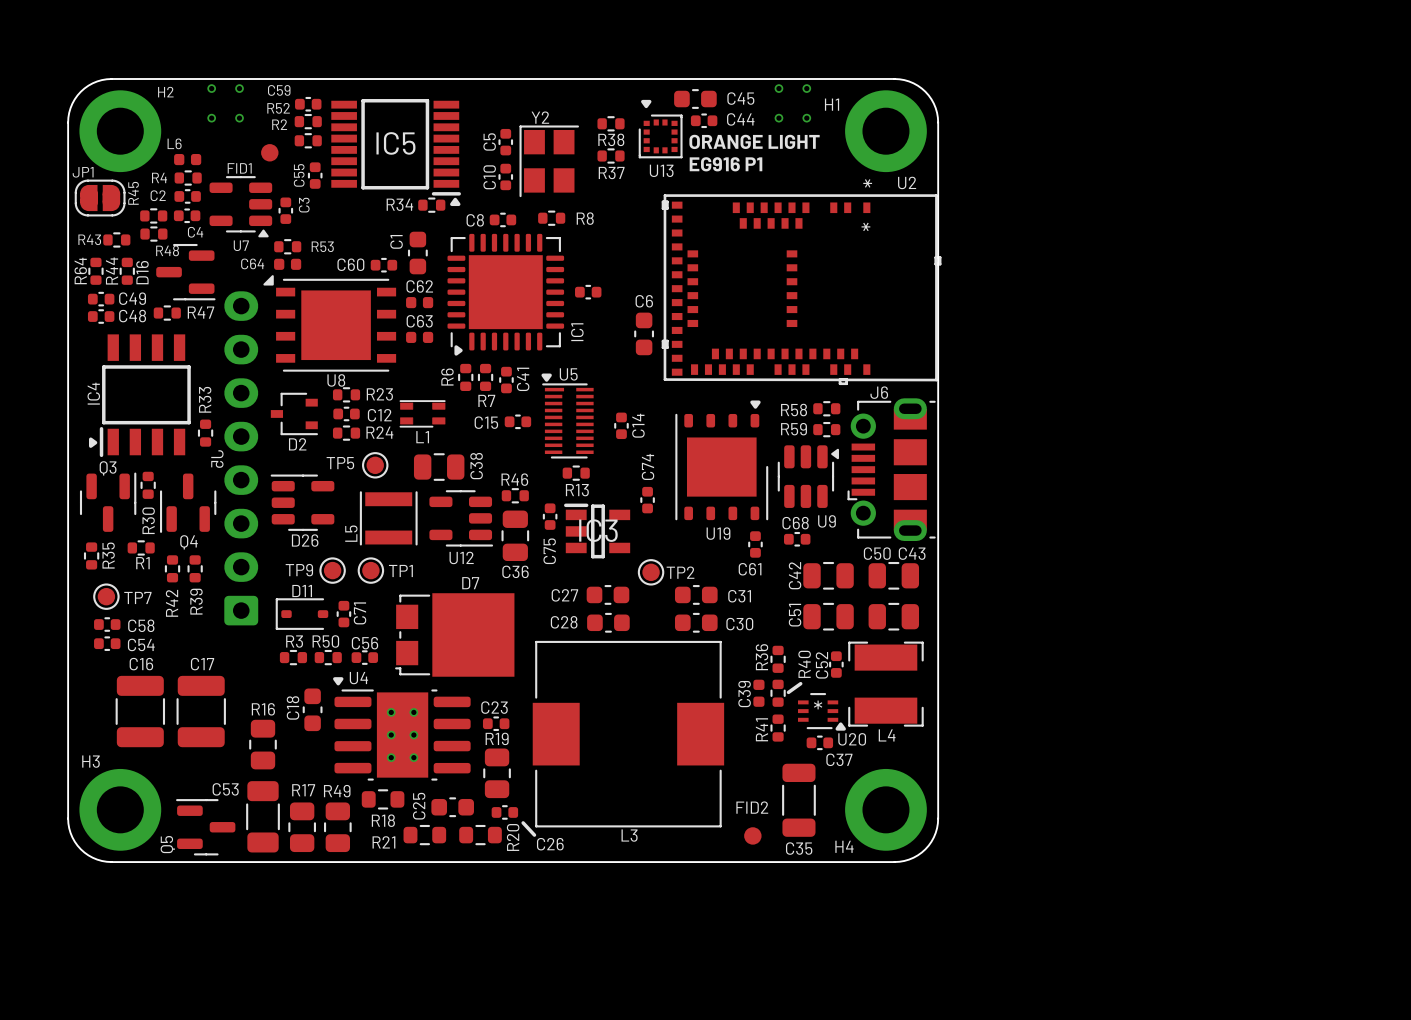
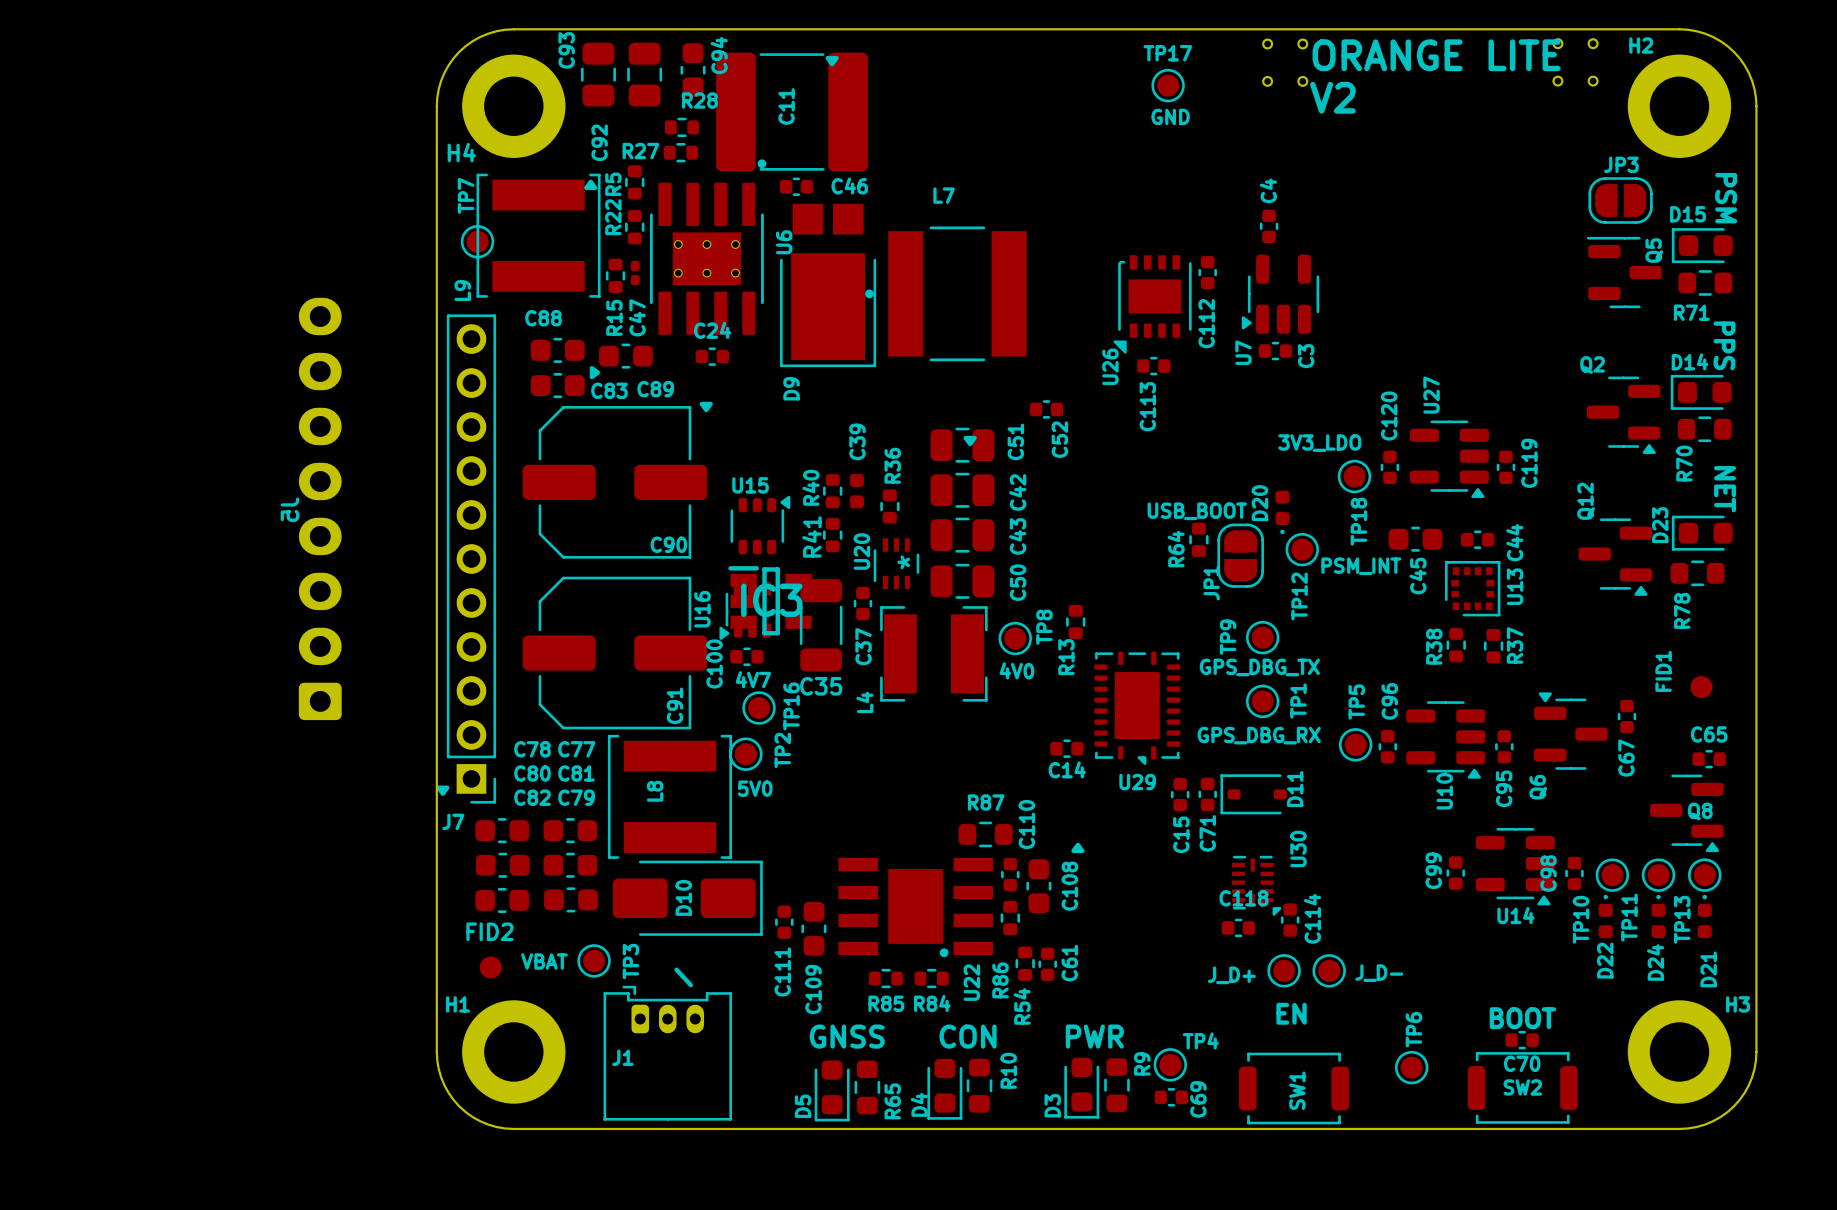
board edge: (111, 78) (894, 78) (909, 81) (925, 91) (933, 103) (938, 122) (938, 818) (935, 832) (925, 849) (909, 859) (894, 862) (111, 862) (92, 857) (80, 849) (70, 832) (68, 818) (68, 122) (72, 103) (80, 91) (97, 81) (111, 78) -> none
board edge: none -> (513, 29) (1679, 29) (1704, 33) (1727, 46) (1739, 58) (1748, 72) (1754, 89) (1756, 106) (1756, 1051) (1752, 1077) (1739, 1099) (1727, 1112) (1712, 1121) (1696, 1127) (1679, 1128) (513, 1128) (488, 1124) (465, 1112) (453, 1099) (444, 1085) (438, 1069) (436, 1051) (436, 106) (438, 89) (444, 72) (459, 51) (472, 41) (488, 33) (513, 29)
H2 name position: H2 (165, 92) -> H2 (1641, 45)
C45 name rotation: 0° (740, 98) -> 90° counterclockwise (1418, 576)
C45 name position: C45 (740, 98) -> C45 (1418, 576)
C45 position: (695, 99) -> (1415, 539)
text: none -> ORANGE LITE (1436, 55)
part: (225, 103) -> none
part position: (792, 103) -> (1285, 62)
C59: (308, 104) -> none
H1 name position: H1 (832, 104) -> H1 (458, 1004)
part: none -> (1575, 62)
C94: none -> (693, 70)
C93: none -> (598, 74)
C92: none -> (644, 74)
C44 name rotation: 0° (740, 119) -> 90° counterclockwise (1514, 542)
C44 position: (704, 120) -> (1477, 539)
R52: (308, 121) -> none
R38 rotation: 0° (611, 123) -> 90° clockwise (1456, 645)
R38 position: (611, 123) -> (1456, 645)
TP17: none -> (1168, 85)
H2 position: (120, 131) -> (1679, 106)
H1 position: (885, 131) -> (513, 1051)
text: none -> V2 (1332, 97)
U13 rotation: 0° (660, 136) -> 90° counterclockwise (1472, 588)
U13 position: (660, 136) -> (1472, 588)
R2: (308, 140) -> none
text: ORANGE LIGHT (754, 141) -> none
C5: (505, 142) -> none
C11: none -> (792, 111)
IC5: (396, 147) -> none
text: none -> GND (1170, 116)
FID1 position: (269, 152) -> (1701, 687)
R28: none -> (682, 127)
R37 rotation: 0° (611, 156) -> 90° clockwise (1493, 646)
R37 position: (611, 156) -> (1493, 646)
L6: (187, 159) -> none
Y2: (549, 161) -> none
text: EG916 P1 (725, 164) -> none
FID1 name rotation: 0° (239, 168) -> 90° counterclockwise (1663, 671)
JP1 name position: JP1 (83, 172) -> JP1 (1211, 582)
C55: (315, 175) -> none
C10: (505, 176) -> none
R27: none -> (680, 152)
R4: (188, 178) -> none
C2: (187, 196) -> none
JP1 rotation: 0° (100, 198) -> 90° clockwise (1240, 555)
JP1 position: (100, 198) -> (1240, 555)
R5: none -> (634, 182)
C46: none -> (796, 186)
R34: (431, 205) -> none
U7 rotation: 0° (240, 206) -> 90° clockwise (1280, 294)
U7 position: (240, 206) -> (1280, 294)
text: none -> PSM (1726, 198)
C3 rotation: 0° (285, 210) -> 90° clockwise (1275, 351)
C3 position: (285, 210) -> (1275, 351)
JP3: none -> (1620, 200)
R45: (153, 215) -> none
C4 rotation: 0° (187, 215) -> 90° clockwise (1269, 226)
C4 position: (187, 215) -> (1269, 226)
R8: (551, 218) -> none
C8: (502, 219) -> none
C4 name position: C4 (195, 232) -> C4 (1268, 190)
R48: (153, 234) -> none
R22: none -> (634, 227)
R43: (116, 239) -> none
L9: none -> (538, 235)
R53: (287, 246) -> none
D15: none -> (1702, 245)
U6: none -> (708, 247)
C1: (417, 253) -> none
C64: (287, 264) -> none
C60: (383, 265) -> none
R64 name position: R64 (80, 270) -> R64 (1176, 549)
R64 position: (95, 271) -> (1198, 539)
R44: (127, 271) -> none
C47: none -> (635, 273)
C112: none -> (1207, 272)
D16: (185, 272) -> none
R15: none -> (615, 275)
R71: none -> (1705, 282)
D9: none -> (828, 285)
L7: none -> (945, 293)
U2: (801, 289) -> none
IC1: (505, 292) -> none
part: (588, 292) -> none
U26: none -> (1152, 304)
C49: (101, 299) -> none
C62: (419, 302) -> none
R47: (167, 313) -> none
C48: (101, 316) -> none
U8: (329, 323) -> none
text: none -> PPS (1724, 345)
C88: none -> (557, 350)
C6: (644, 333) -> none
C63: (419, 337) -> none
C89: none -> (625, 356)
C24: none -> (712, 356)
C113: none -> (1153, 366)
C83: none -> (557, 385)
D14: none -> (1701, 392)
R6: (465, 377) -> none
R7: (485, 377) -> none
C41: (506, 380) -> none
Q2: none -> (1623, 415)
R23: (346, 394) -> none
IC4: (145, 395) -> none
R70: none -> (1704, 429)
text: none -> 3V3_LDO (1319, 443)
R58: (826, 408) -> none
D2: (294, 413) -> none
C12: (346, 413) -> none
L1: (422, 413) -> none
U27: none -> (1449, 459)
U5: (567, 420) -> none
C15 rotation: 0° (517, 421) -> 90° clockwise (1180, 794)
C15 position: (517, 421) -> (1180, 794)
C15 name position: C15 (486, 422) -> C15 (1181, 834)
C14 rotation: 0° (621, 425) -> 90° clockwise (1066, 748)
C14 position: (621, 425) -> (1066, 748)
C120: none -> (1389, 467)
C119: none -> (1505, 467)
R59: (826, 429) -> none
TP18: none -> (1354, 476)
R33: (205, 433) -> none
R24: (346, 433) -> none
drawing: [88, 437, 98, 448] -> none
C90: none -> (614, 482)
text: none -> NET (1725, 489)
text: none -> USB_BOOT (1197, 511)
D20: none -> (1282, 512)
TP5 name rotation: 0° (340, 463) -> 90° counterclockwise (1356, 702)
TP5 name position: TP5 (340, 463) -> TP5 (1356, 702)
TP5 position: (375, 465) -> (1355, 744)
C38: (439, 467) -> none
U19: (721, 467) -> none
J6: (891, 469) -> none
U15: none -> (760, 524)
R13 rotation: 0° (576, 473) -> 90° clockwise (1075, 622)
R13 position: (576, 473) -> (1075, 622)
U9: (808, 476) -> none
D23: none -> (1702, 533)
R30: (148, 485) -> none
TP12: none -> (1302, 549)
R46: (515, 495) -> none
Q12: none -> (1615, 557)
J7: none -> (471, 558)
C74: (647, 500) -> none
Q3: (108, 502) -> none
D26: (302, 502) -> none
Q4: (188, 503) -> none
text: none -> PSM_INT (1361, 566)
R78: none -> (1697, 573)
C75: (550, 516) -> none
L5: (388, 518) -> none
U12: (461, 518) -> none
C36: (515, 535) -> none
U16: none -> (749, 610)
C68: (797, 539) -> none
C61 position: (755, 544) -> (1047, 964)
R1: (141, 547) -> none
C50 name rotation: 0° (877, 553) -> 90° counterclockwise (1018, 582)
C50 name position: C50 (877, 553) -> C50 (1018, 582)
C43 name rotation: 0° (912, 553) -> 90° counterclockwise (1017, 536)
C43 name position: C43 (912, 553) -> C43 (1017, 536)
R35: (91, 555) -> none
TP8: none -> (1015, 638)
R42: (172, 568) -> none
R39: (195, 568) -> none
C61 name rotation: 0° (750, 569) -> 90° counterclockwise (1069, 963)
TP9 name rotation: 0° (299, 570) -> 90° counterclockwise (1228, 637)
TP9 position: (332, 570) -> (1262, 637)
TP1 position: (370, 570) -> (1262, 701)
TP1 name rotation: 0° (400, 570) -> 90° counterclockwise (1298, 700)
C91: none -> (614, 653)
TP2 position: (651, 572) -> (745, 754)
TP2 name rotation: 0° (680, 572) -> 90° counterclockwise (782, 750)
C100: none -> (746, 656)
C42 name position: C42 (795, 575) -> C42 (1017, 492)
C42 position: (828, 575) -> (962, 490)
C50 position: (893, 575) -> (962, 581)
text: none -> GPS_DBG_TX (1259, 667)
text: none -> 4V0 (1016, 670)
D11 name rotation: 0° (302, 591) -> 90° counterclockwise (1295, 789)
text: none -> 4V7 (753, 679)
C27: (607, 594) -> none
C31: (696, 594) -> none
TP7 position: (106, 596) -> (477, 241)
TP7 name rotation: 0° (137, 597) -> 90° counterclockwise (466, 195)
TP7 name position: TP7 (137, 597) -> TP7 (466, 195)
C71 name position: C71 (360, 613) -> C71 (1207, 833)
D11 position: (301, 614) -> (1253, 794)
C71 position: (343, 614) -> (1207, 794)
TP16: none -> (759, 708)
C51 name position: C51 (795, 615) -> C51 (1015, 441)
C51 position: (828, 616) -> (962, 445)
U29: none -> (1137, 708)
C43 position: (893, 616) -> (962, 535)
C28: (608, 622) -> none
C30: (696, 622) -> none
C67: none -> (1626, 716)
C58: (107, 624) -> none
D7: (454, 634) -> none
Q6: none -> (1570, 731)
text: none -> GPS_DBG_RX (1259, 735)
U10: none -> (1445, 739)
C54: (107, 643) -> none
C96: none -> (1387, 746)
C95: none -> (1504, 746)
C65: none -> (1709, 759)
R3: (293, 657) -> none
R50: (328, 657) -> none
C56: (364, 657) -> none
R36 name position: R36 (761, 657) -> R36 (892, 465)
R36 position: (778, 659) -> (889, 506)
R40 name position: R40 (804, 664) -> R40 (811, 487)
C52 rotation: 0° (836, 664) -> 90° clockwise (1046, 409)
C52 position: (836, 664) -> (1046, 409)
text: none -> 5V0 (755, 788)
line: (800, 683) (788, 692) -> none
L4 rotation: 0° (885, 684) -> 90° clockwise (933, 653)
L4 position: (885, 684) -> (933, 653)
L8: none -> (669, 796)
C39 position: (758, 693) -> (856, 491)
R40 position: (778, 693) -> (832, 491)
U20 footprint: [797, 693, 839, 730] -> [873, 538, 920, 590]
C39 name position: C39 (744, 694) -> C39 (857, 441)
Q8: none -> (1686, 813)
C18: (312, 709) -> none
C16: (140, 711) -> none
C17: (201, 711) -> none
C78: none -> (502, 830)
C77: none -> (570, 830)
R87: none -> (985, 834)
C23: (496, 723) -> none
R41 position: (778, 728) -> (832, 535)
L3: (628, 734) -> none
U4: (402, 735) -> none
L4 name position: L4 (887, 735) -> L4 (864, 702)
U20 name position: U20 (852, 739) -> U20 (861, 551)
C80: none -> (502, 865)
C79: none -> (570, 865)
U14: none -> (1515, 866)
C37 rotation: 0° (819, 742) -> 90° clockwise (862, 603)
C37 position: (819, 742) -> (862, 603)
R16: (263, 744) -> none
C99: none -> (1455, 873)
C98: none -> (1574, 873)
C110: none -> (1010, 874)
TP10: none -> (1612, 875)
TP11: none -> (1658, 875)
TP13: none -> (1704, 875)
C108: none -> (1038, 886)
U30: none -> (1256, 885)
H3 name position: H3 (90, 761) -> H3 (1738, 1004)
D10: none -> (687, 898)
C81: none -> (570, 899)
C82: none -> (502, 900)
R19: (497, 773) -> none
U22: none -> (915, 907)
D22: none -> (1605, 916)
D24: none -> (1658, 916)
D21: none -> (1704, 916)
R86: none -> (1010, 918)
C114: none -> (1290, 920)
C111: none -> (784, 922)
C118: none -> (1238, 927)
C109: none -> (813, 928)
R18: (383, 799) -> none
C35 position: (798, 800) -> (821, 625)
C25: (452, 807) -> none
H3 position: (120, 809) -> (1679, 1051)
H4 position: (885, 809) -> (513, 106)
C26: (504, 812) -> none
TP3: none -> (594, 960)
C53: (263, 816) -> none
text: none -> VBAT (544, 961)
R54: none -> (1025, 963)
part: none -> (1284, 970)
part: none -> (1329, 970)
text: none -> J_D- (1379, 973)
text: none -> J_D+ (1231, 975)
Q5 position: (205, 827) -> (1624, 272)
R17: (302, 827) -> none
R49: (337, 827) -> none
R85: none -> (886, 978)
R84: none -> (931, 978)
R21: (424, 835) -> none
R20: (480, 835) -> none
FID2 position: (752, 835) -> (490, 967)
Q5 name position: Q5 (167, 844) -> Q5 (1654, 250)
text: none -> EN (1291, 1013)
text: none -> BOOT (1522, 1018)
text: none -> GNSS (847, 1036)
text: none -> CON (968, 1036)
text: none -> PWR (1094, 1036)
C70: none -> (1522, 1040)
J1: none -> (667, 1053)
TP4: none -> (1170, 1064)
TP6: none -> (1411, 1067)
R10: none -> (979, 1085)
R9: none -> (1116, 1085)
R65: none -> (867, 1087)
D3: none -> (1081, 1088)
SW1: none -> (1294, 1088)
SW2: none -> (1522, 1087)
D4: none -> (944, 1089)
D5: none -> (832, 1090)
C69: none -> (1171, 1097)

